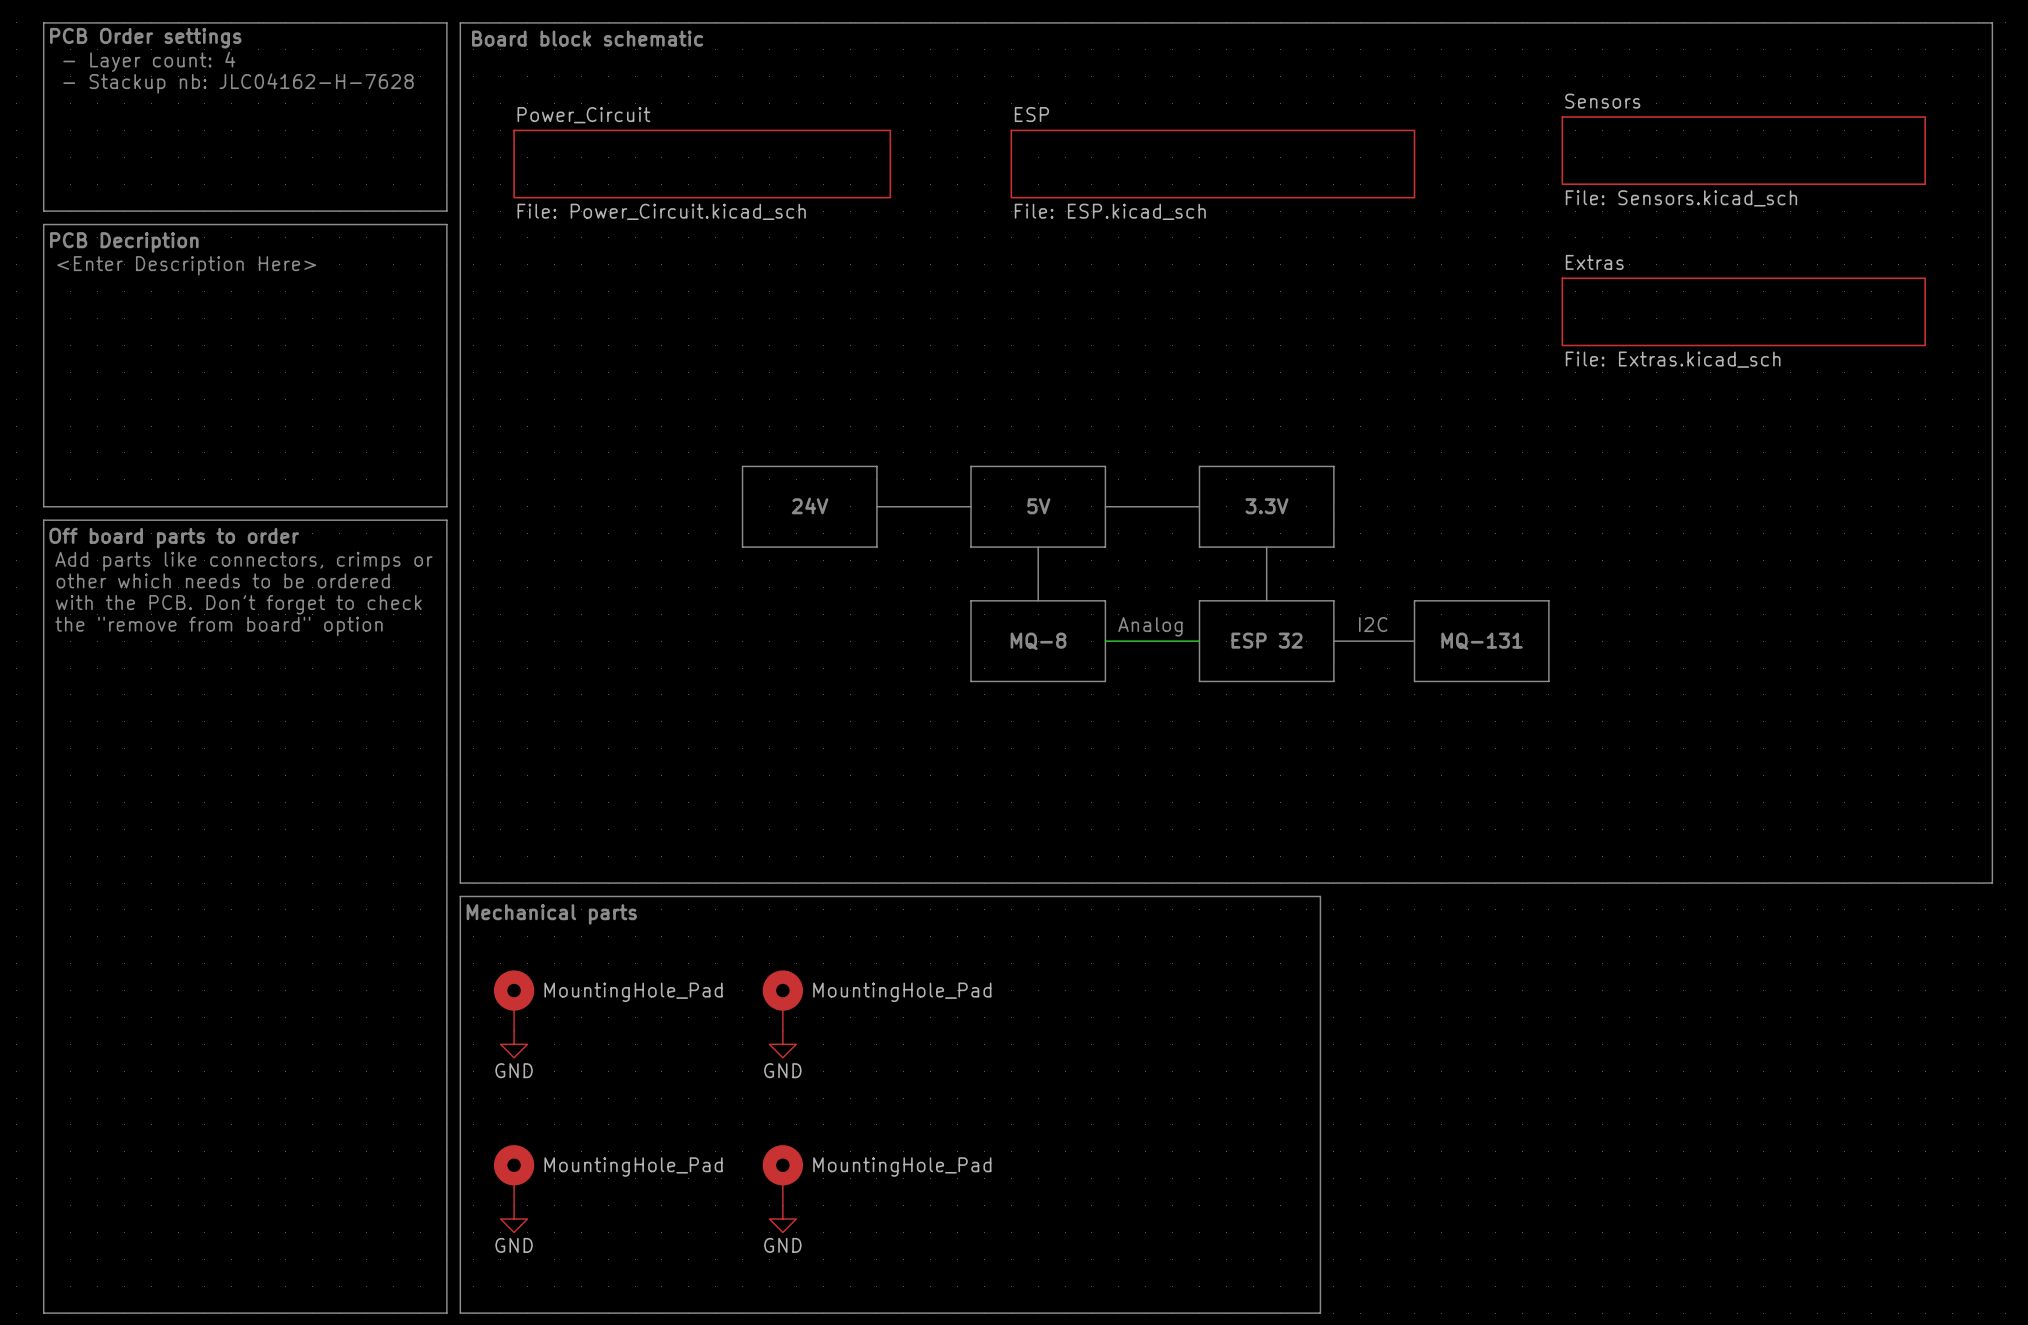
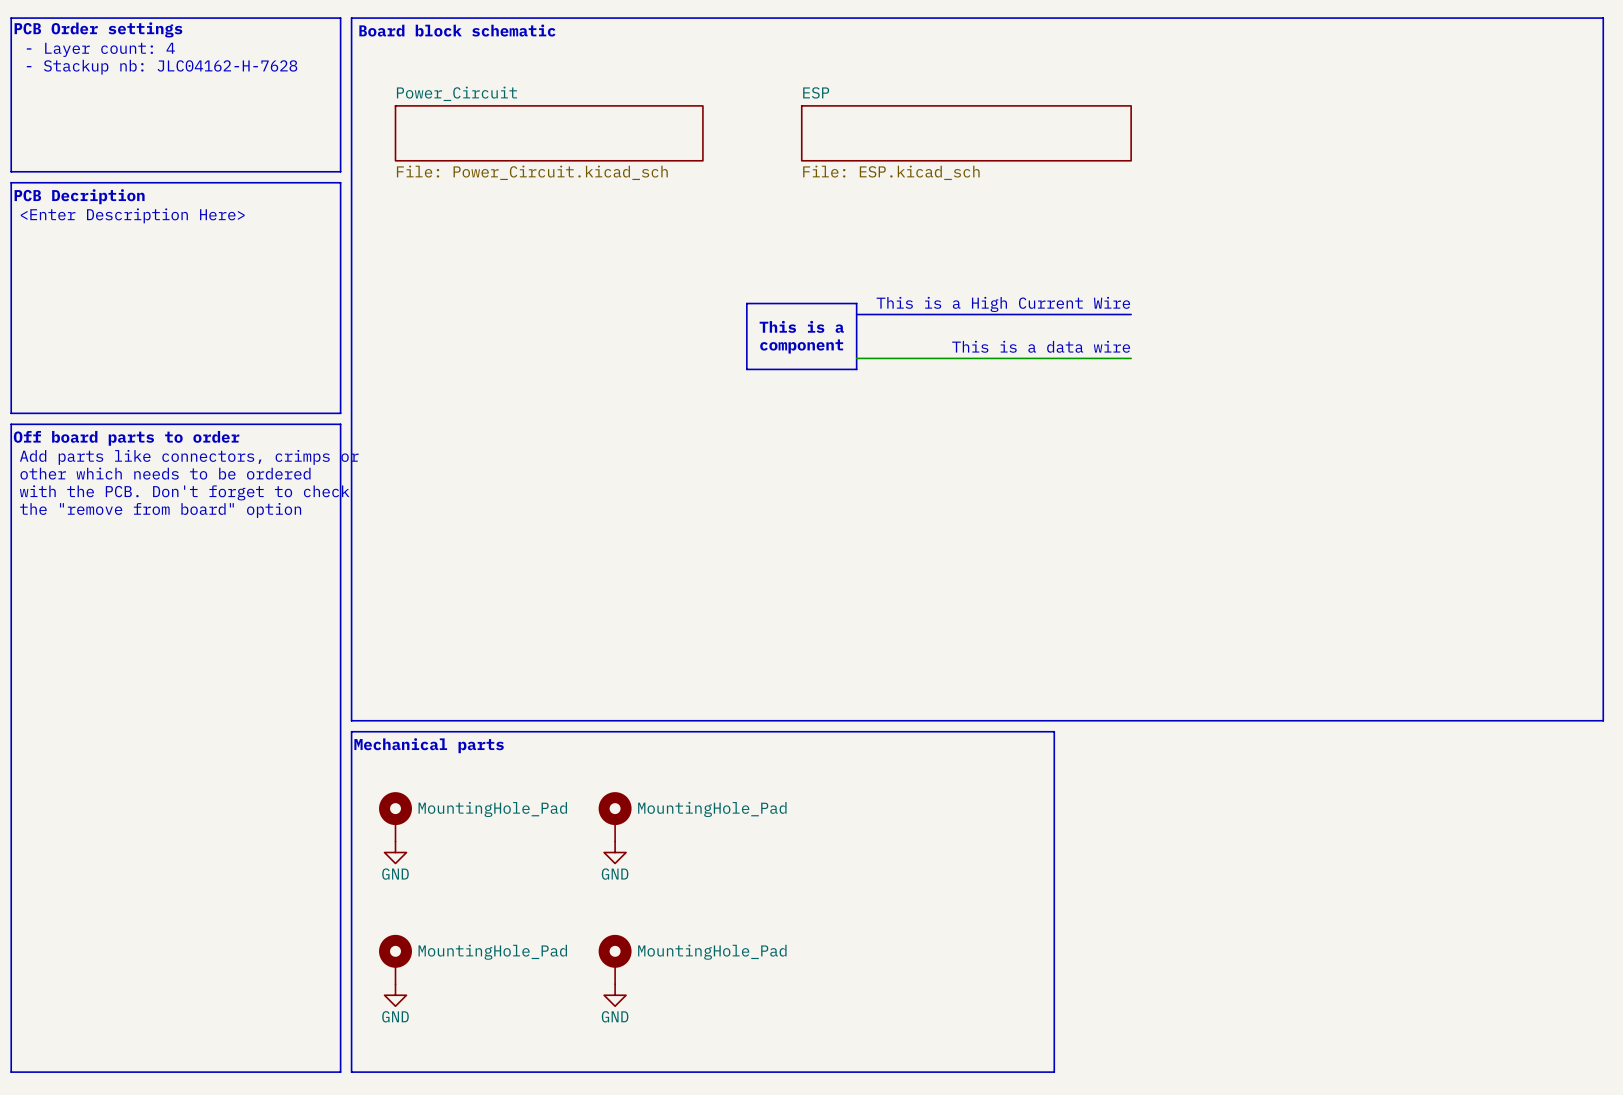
sheet Sensors: File: Sensors.kicad_sch (1743, 150) -> none
sheet Extras: File: Extras.kicad_sch (1743, 311) -> none
text: none -> This is a High Current Wire (1003, 304)
bus: none -> (856, 314) (1131, 314)
text: none -> This is a (801, 326)
text: none -> component (801, 346)
text: none -> This is a data wire (1041, 346)
wire: none -> (856, 358) (1131, 358)
line: (742, 466) (876, 466) (876, 547) (742, 547) (742, 466) -> none
line: (971, 466) (1105, 466) (1105, 547) (971, 547) (971, 466) -> (746, 303) (856, 303) (856, 369) (746, 369) (746, 303)
line: (1199, 466) (1333, 466) (1333, 547) (1199, 547) (1199, 466) -> none
text: 24V (810, 505) -> none
bus: (876, 506) (971, 506) -> none
text: 5V (1038, 506) -> none
bus: (1105, 506) (1199, 506) -> none
text: 3.3V (1266, 506) -> none
bus: (1038, 547) (1038, 600) -> none
bus: (1266, 547) (1266, 600) -> none
line: (971, 600) (971, 681) (1105, 681) (1105, 600) (971, 600) -> none
line: (1199, 600) (1199, 681) (1333, 681) (1333, 600) (1199, 600) -> none
line: (1414, 600) (1548, 600) (1548, 681) (1414, 681) (1414, 600) -> none
text: I2C (1373, 624) -> none
text: Analog (1150, 626) -> none
text: ESP 32 (1266, 640) -> none
text: MQ-8 (1038, 641) -> none
wire: (1105, 641) (1199, 641) -> none
bus: (1333, 641) (1414, 641) -> none
text: MQ-131 (1482, 641) -> none

